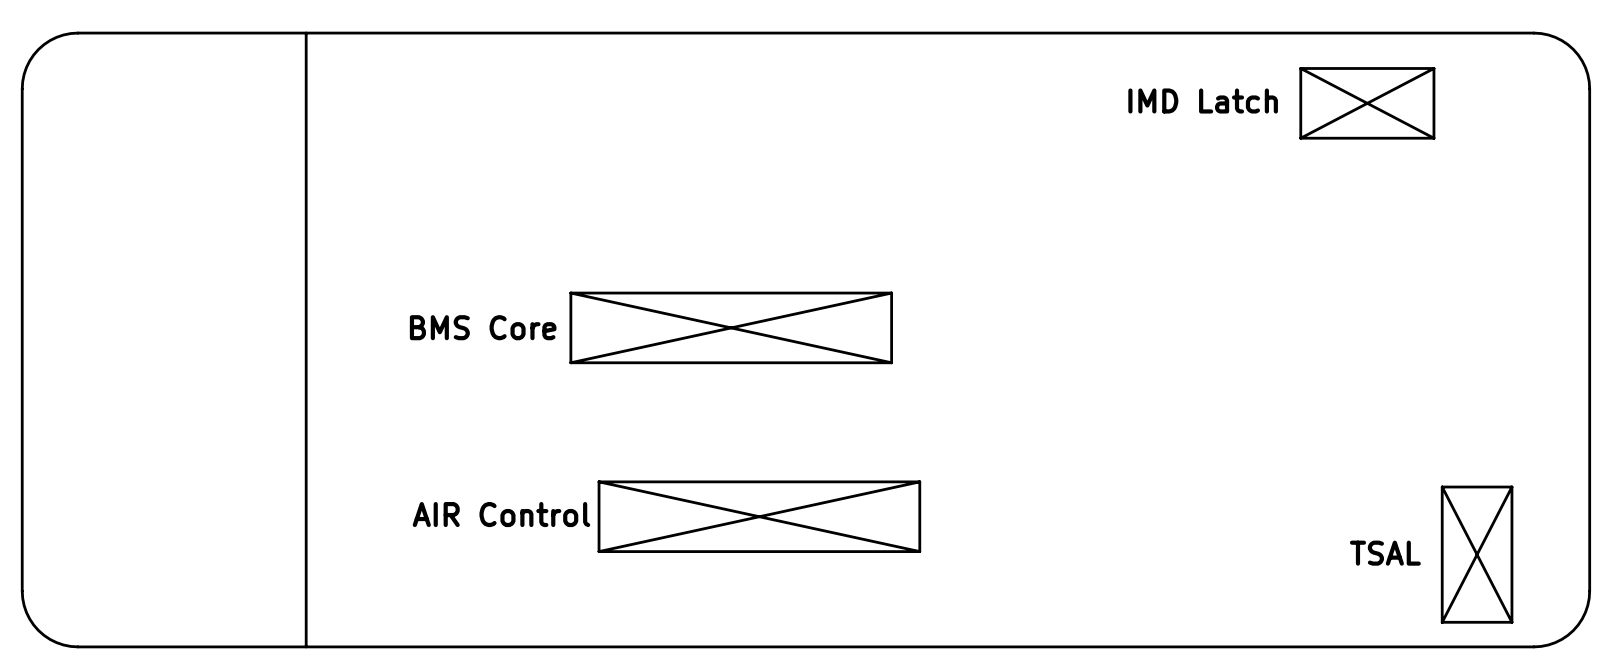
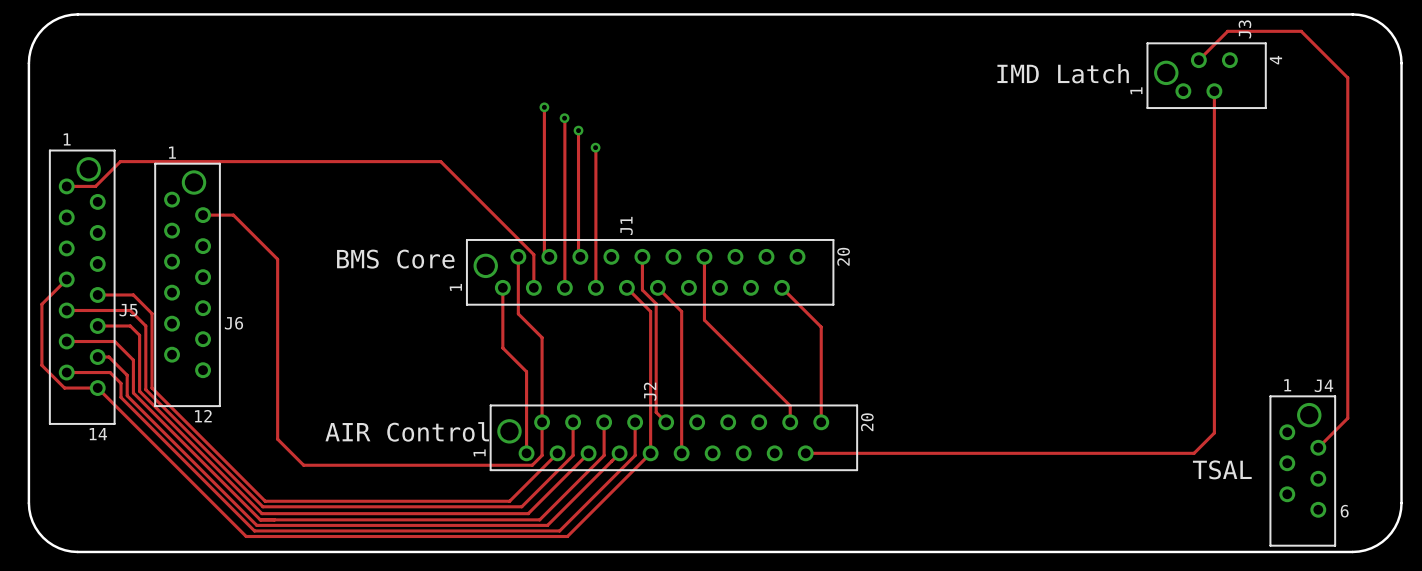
board edge: (306, 33) (306, 646) -> none
board edge: (1300, 68) (1433, 138) -> none
board edge: (1300, 68) (1300, 138) -> none
board edge: (1300, 68) (1433, 68) -> none
board edge: (1433, 68) (1433, 138) -> none
board edge: (1433, 68) (1300, 138) -> none
track: none -> (1198, 60) (1227, 31) (1301, 31) (1347, 77) (1347, 418) (1318, 447)
J3: none -> (1206, 75)
track: none -> (1214, 91) (1214, 433) (1194, 453) (805, 453)
board edge: (1300, 138) (1433, 138) -> none
track: none -> (544, 107) (544, 251) (549, 256)
via: none -> (544, 107)
track: none -> (564, 118) (564, 287)
via: none -> (564, 118)
track: none -> (578, 130) (578, 254) (580, 256)
via: none -> (578, 130)
track: none -> (595, 147) (595, 287)
via: none -> (595, 147)
track: none -> (66, 186) (95, 186) (120, 161) (440, 161) (533, 254) (533, 287)
track: none -> (203, 215) (233, 215) (277, 259) (277, 439) (303, 465) (532, 465) (542, 455) (542, 337) (518, 313) (518, 256)
board edge: (570, 293) (891, 362) -> none
board edge: (570, 293) (570, 362) -> none
board edge: (570, 293) (891, 293) -> none
board edge: (891, 293) (570, 362) -> none
board edge: (891, 293) (891, 362) -> none
track: none -> (642, 256) (642, 289) (656, 303) (656, 412) (666, 422)
track: none -> (704, 256) (704, 320) (790, 405) (790, 422)
text position: BMS Core (483, 327) -> BMS Core (395, 259)
J1: none -> (650, 272)
track: none -> (66, 279) (41, 304) (41, 365) (64, 388) (97, 388) (246, 536) (567, 536) (650, 453) (650, 311) (626, 287)
J6: none -> (187, 284)
J5: none -> (82, 287)
track: none -> (502, 287) (502, 348) (526, 371) (526, 453)
track: none -> (657, 287) (681, 311) (681, 453)
track: none -> (782, 287) (821, 327) (821, 422)
track: none -> (97, 294) (133, 294) (152, 313) (152, 388) (265, 501) (509, 501) (557, 453)
board edge: (570, 362) (891, 362) -> none
track: none -> (66, 310) (130, 310) (145, 326) (145, 389) (262, 506) (521, 506) (573, 455) (573, 422)
track: none -> (97, 326) (130, 326) (139, 335) (139, 391) (261, 513) (528, 513) (588, 453)
track: none -> (66, 341) (114, 341) (133, 360) (133, 392) (260, 519) (539, 519) (604, 455) (604, 422)
track: none -> (97, 357) (108, 357) (127, 375) (127, 395) (256, 525) (547, 525) (619, 453)
track: none -> (66, 372) (110, 372) (121, 383) (121, 397) (254, 530) (559, 530) (635, 455) (635, 422)
board edge: (599, 481) (599, 551) -> none
board edge: (599, 481) (919, 481) -> none
board edge: (599, 481) (919, 551) -> none
board edge: (919, 481) (599, 551) -> none
board edge: (919, 481) (919, 551) -> none
board edge: (1442, 487) (1442, 622) -> none
board edge: (1442, 487) (1511, 622) -> none
board edge: (1442, 487) (1511, 487) -> none
board edge: (1511, 487) (1511, 622) -> none
board edge: (1511, 487) (1442, 622) -> none
text position: AIR Control (501, 514) -> AIR Control (407, 431)
J2: none -> (673, 437)
board edge: (599, 551) (919, 551) -> none
J4: none -> (1302, 471)
board edge: (1442, 622) (1511, 622) -> none

